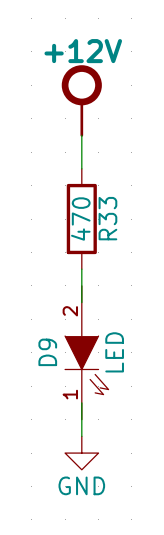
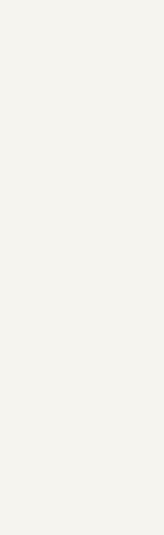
power symbol: (81, 100) -> none
wire: (81, 135) (81, 168) -> none
R33: 470 (81, 219) -> none
wire: (81, 269) (81, 302) -> none
D9: LED (86, 352) -> none
wire: (81, 402) (81, 436) -> none
power symbol: GND (81, 453) -> none

